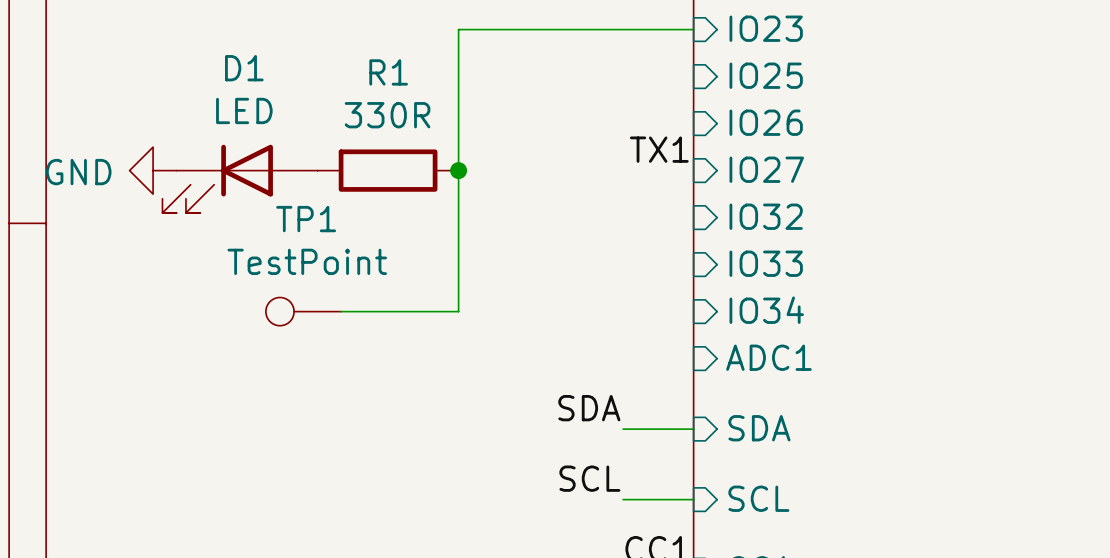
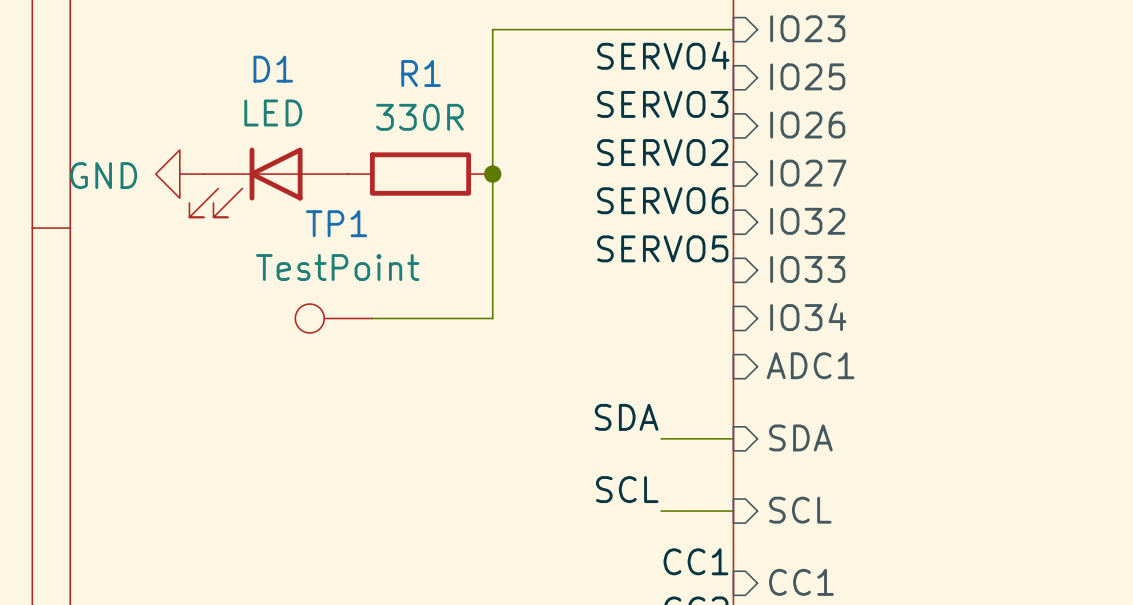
label: none -> SERVO4 (663, 55)
label: none -> SERVO3 (662, 104)
label: TX1 (659, 149) -> SERVO2 (662, 152)
label: none -> SERVO6 (662, 200)
label: none -> SERVO5 (662, 248)

